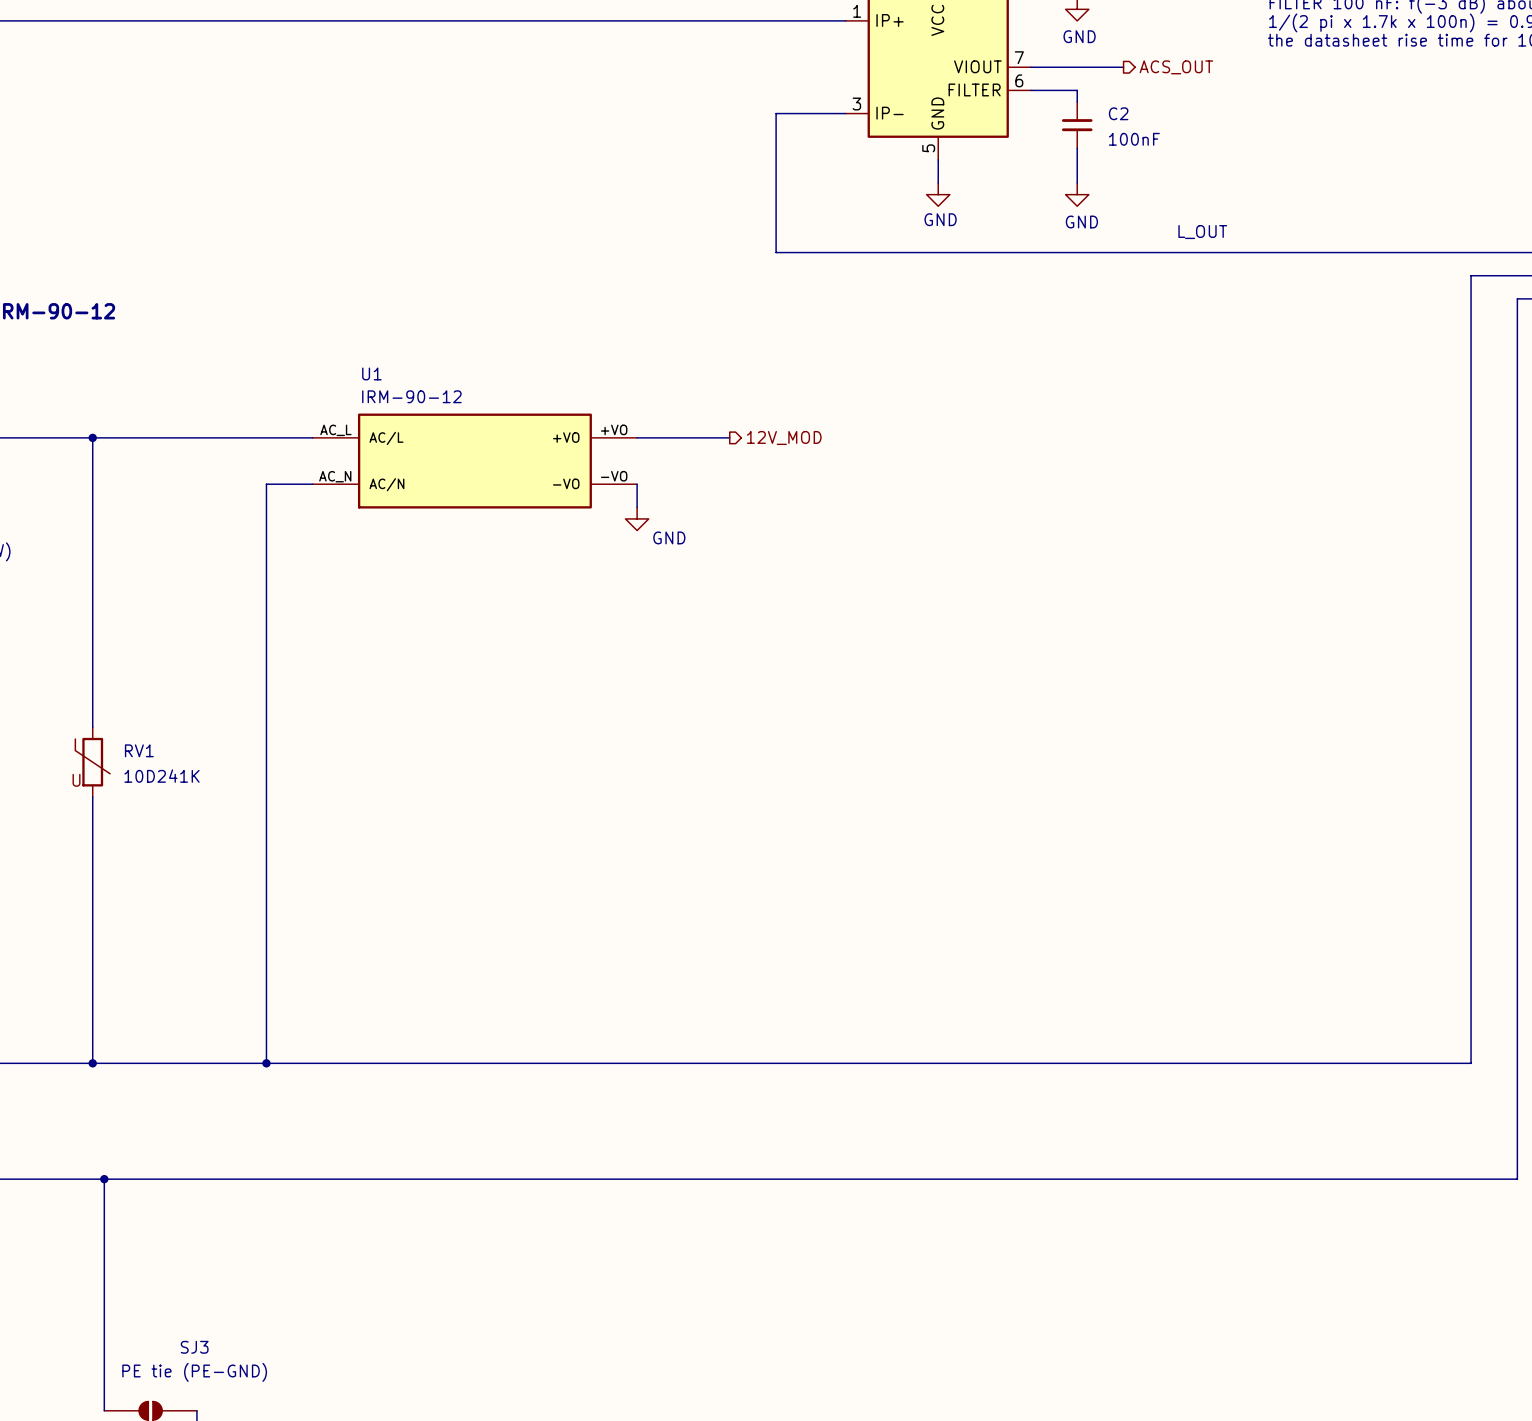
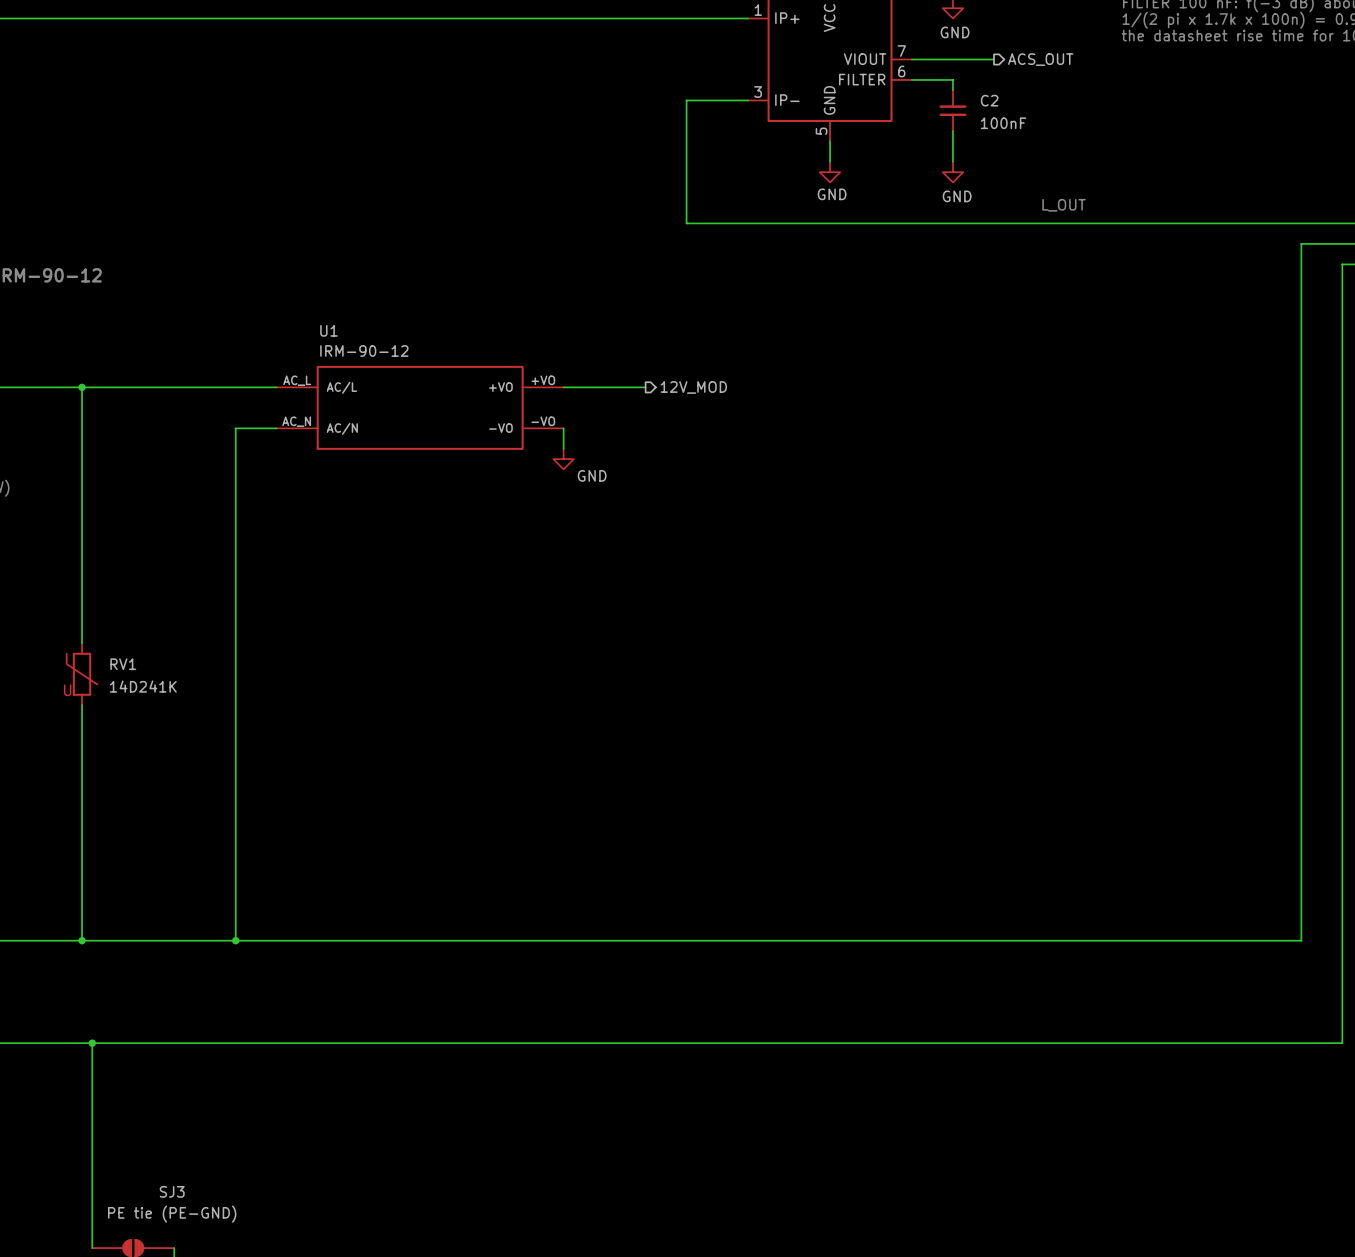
RV1 value: 10D241K (161, 776) -> 14D241K (143, 686)

